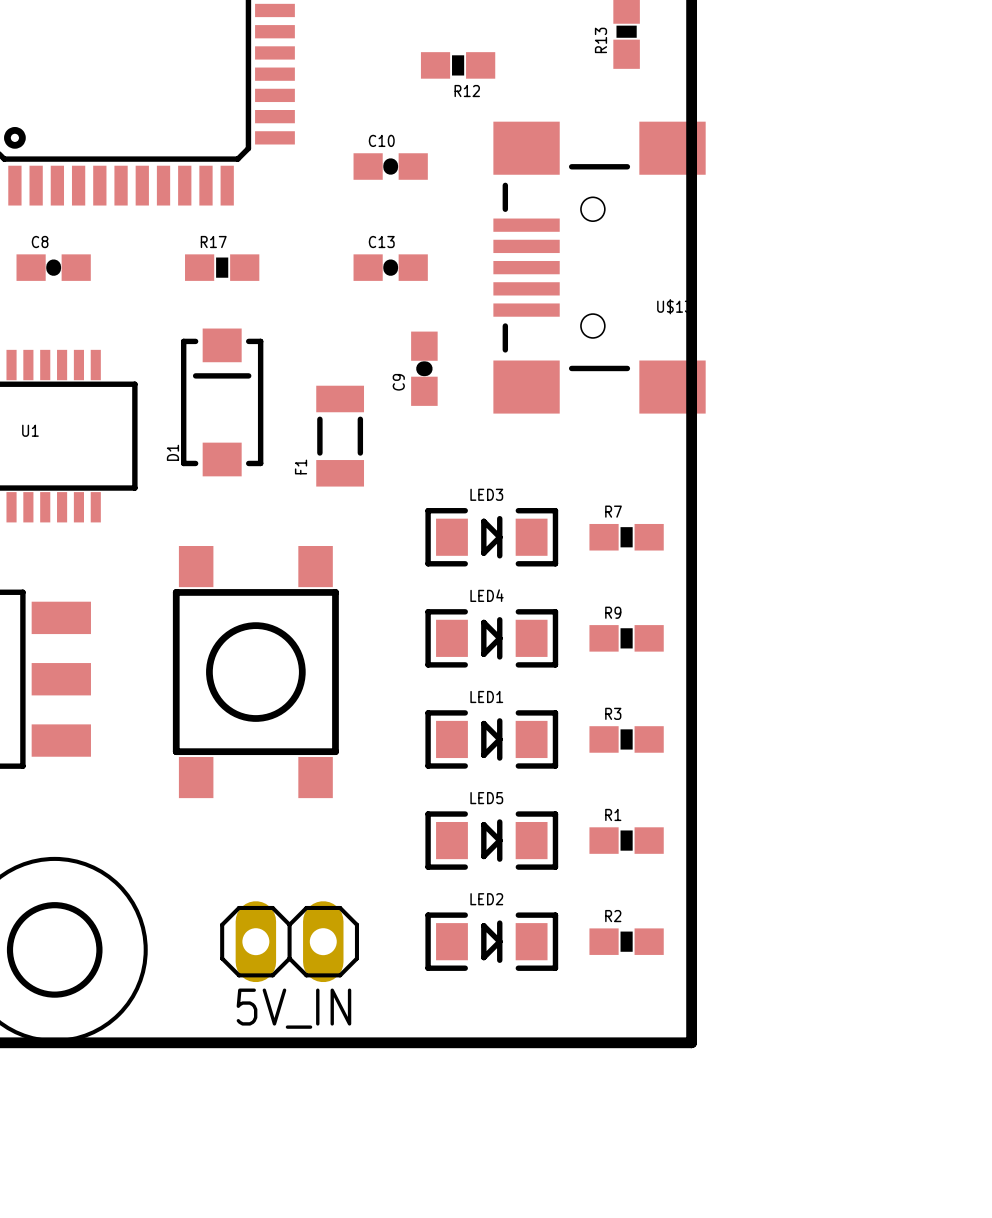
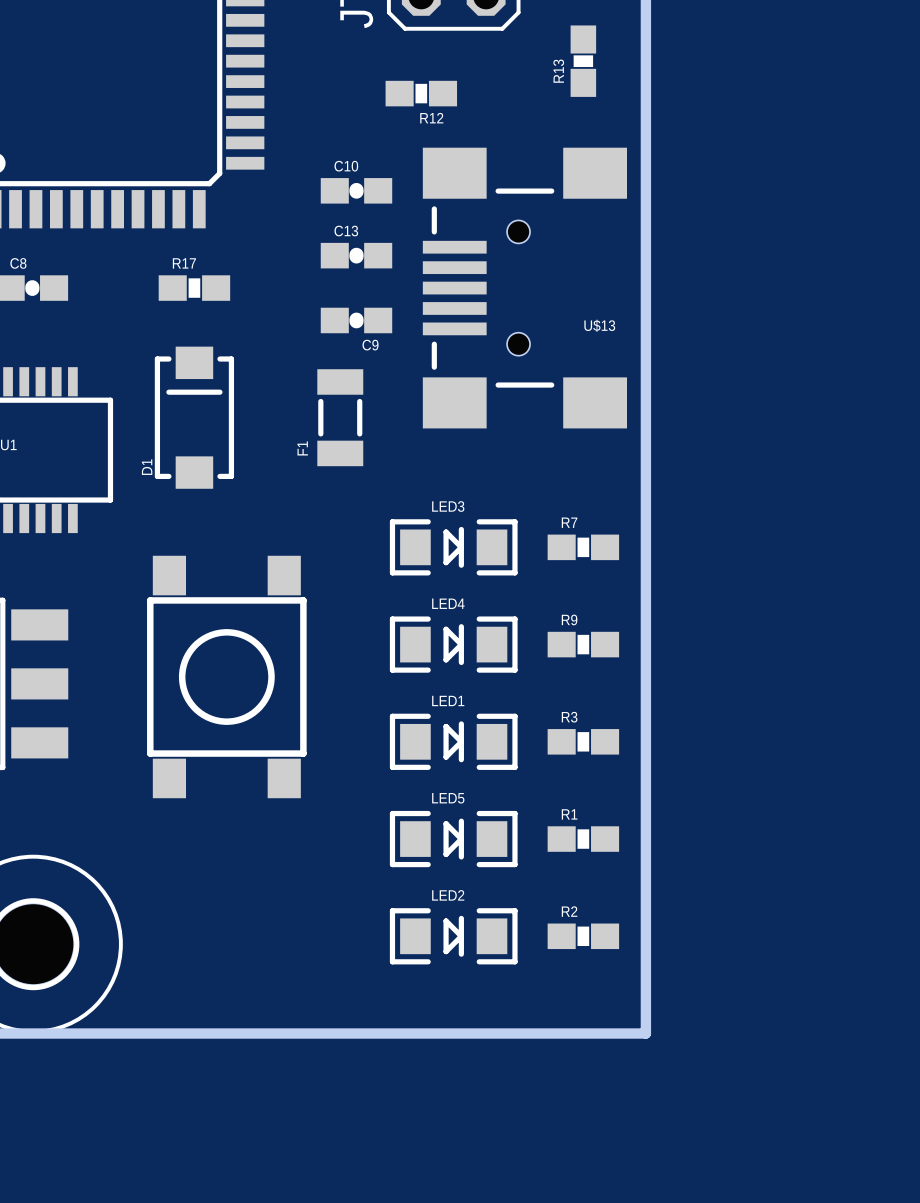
C13 position: (390, 267) -> (356, 255)
U$13 position: (599, 267) -> (524, 288)
C9 rotation: 0° (424, 368) -> 90° clockwise (356, 320)
C9 position: (424, 368) -> (356, 320)
F1 position: (340, 436) -> (340, 417)
5V_IN: (289, 941) -> none

